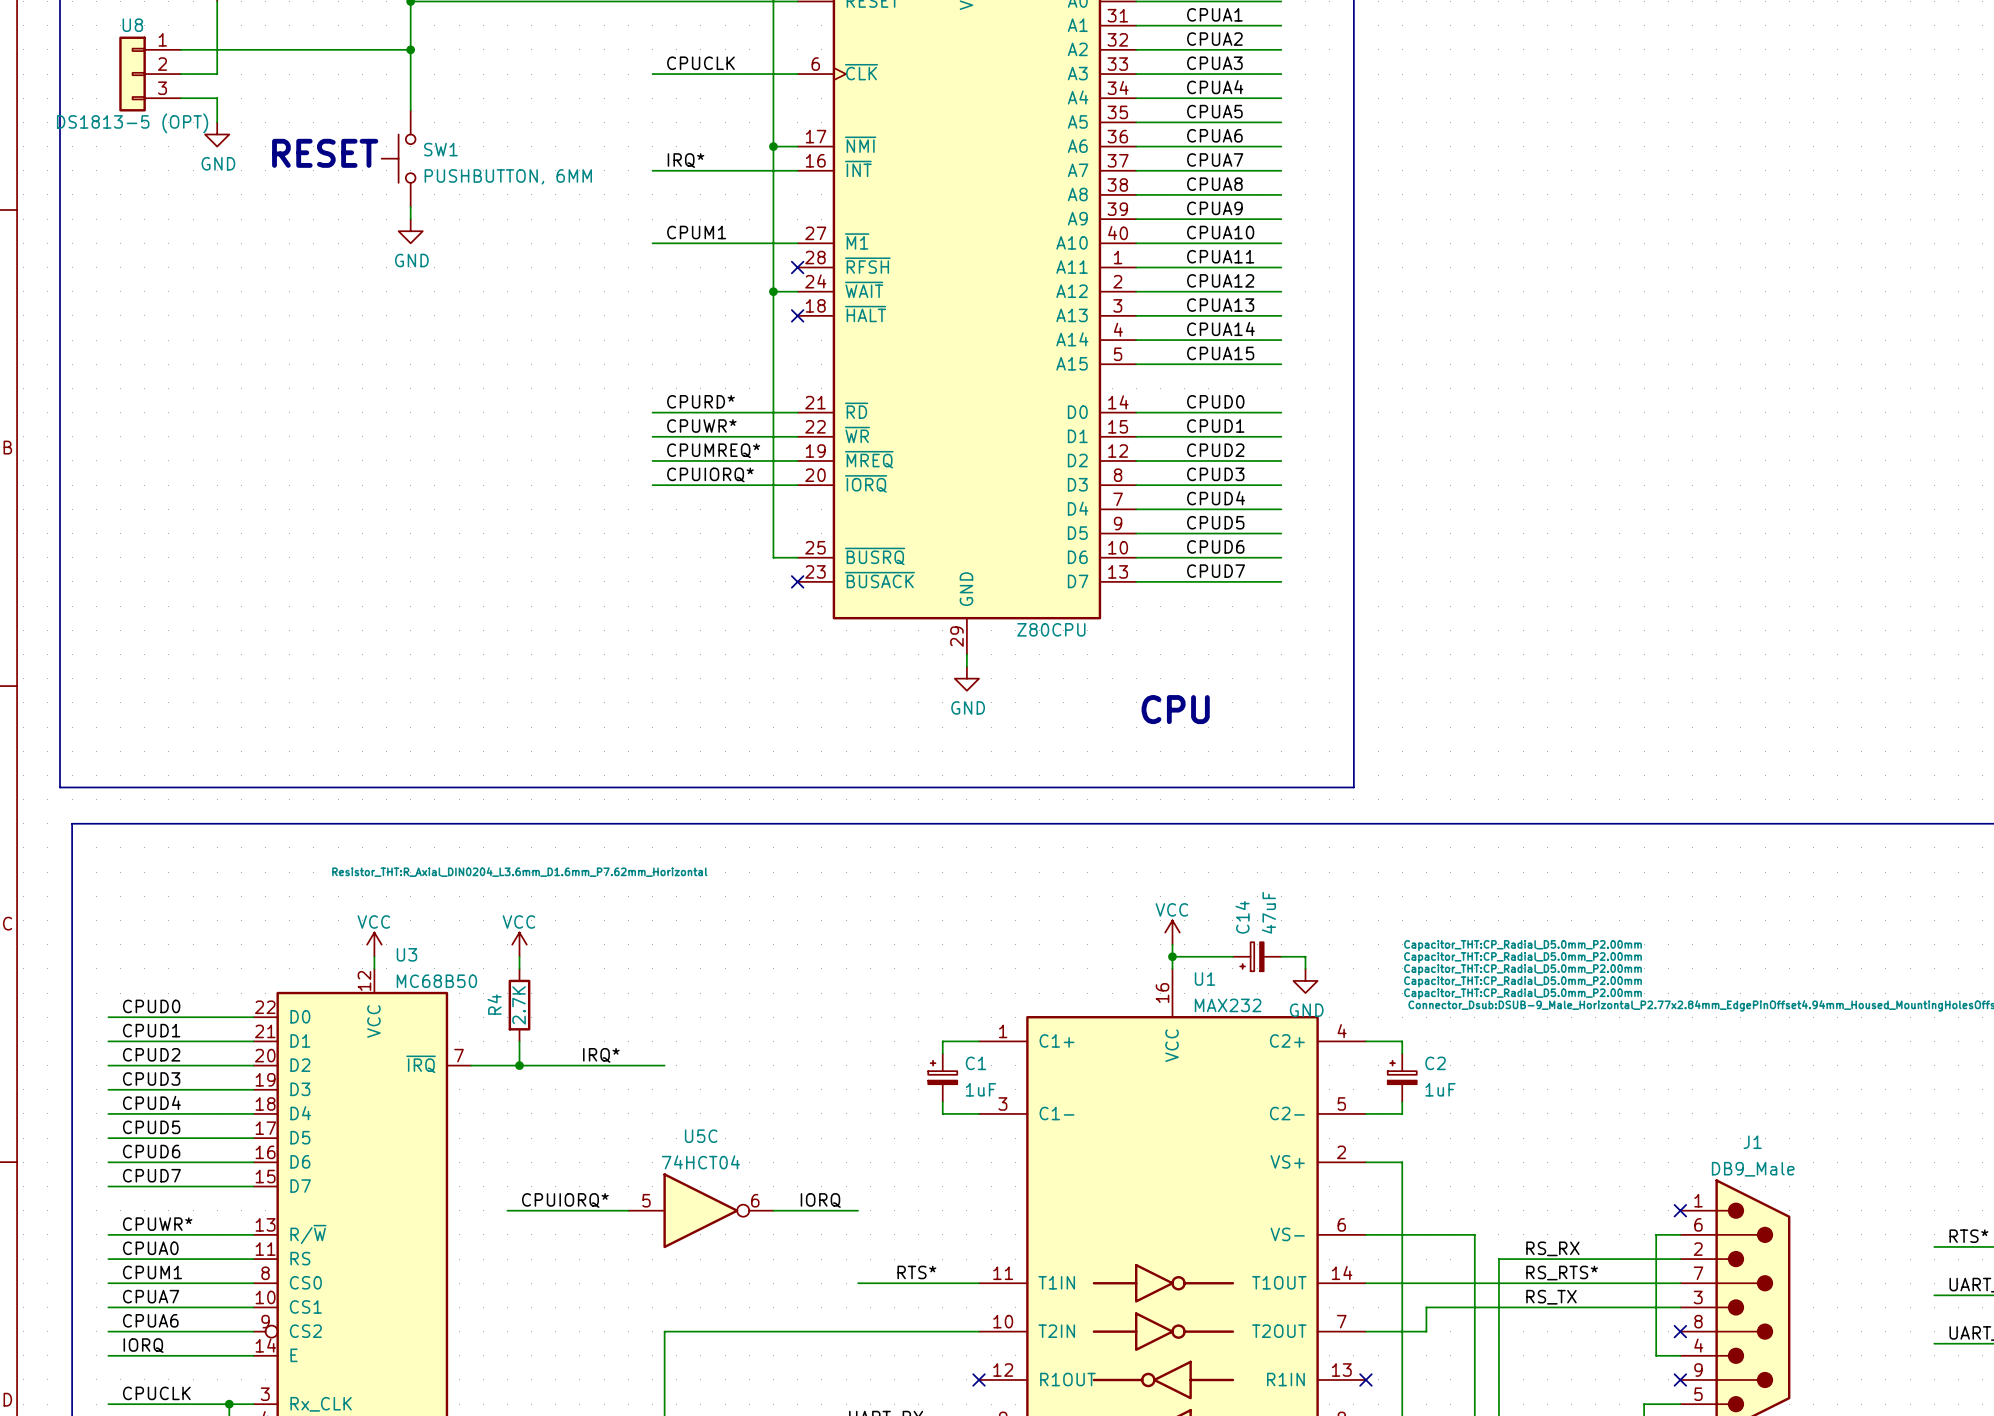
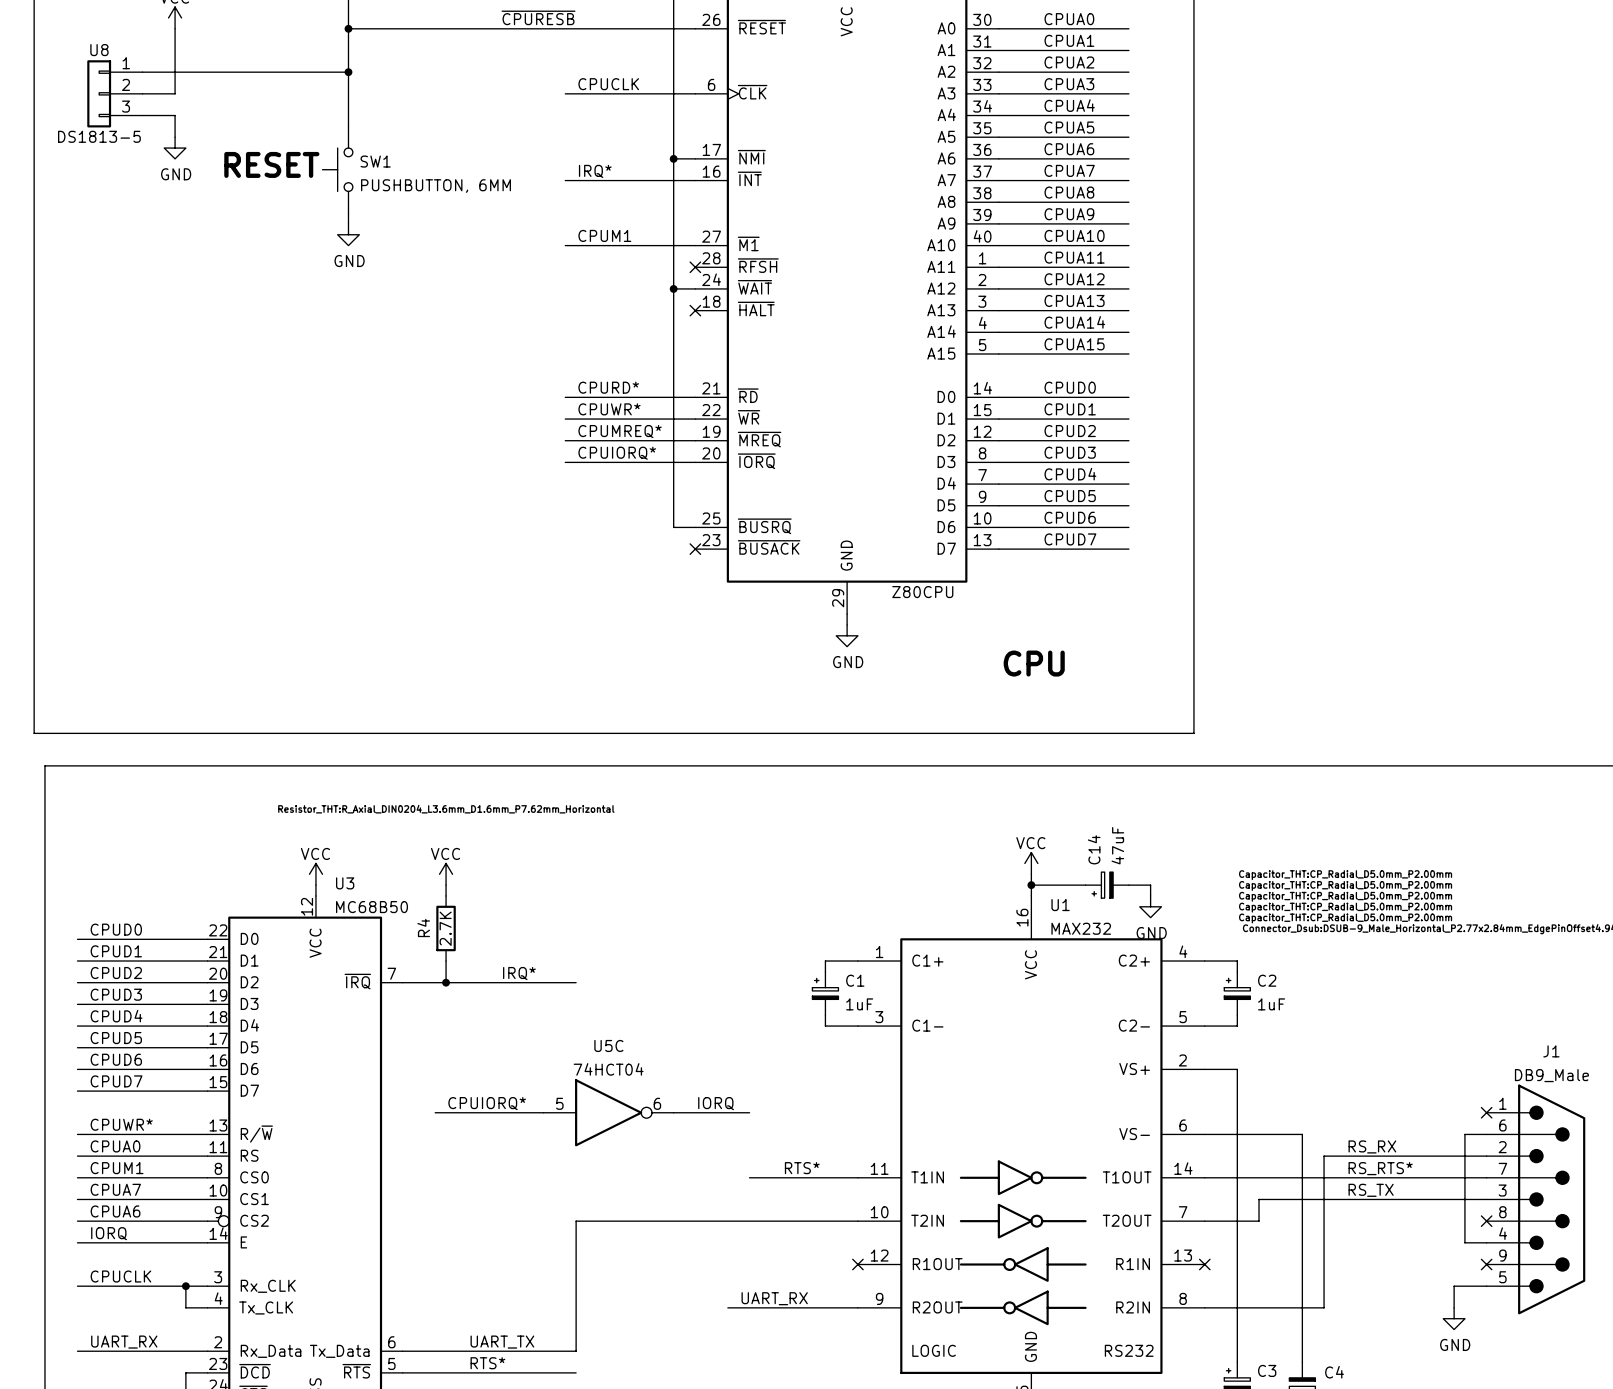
U8 value: DS1813-5 (OPT) (132, 123) -> DS1813-5 (99, 136)

